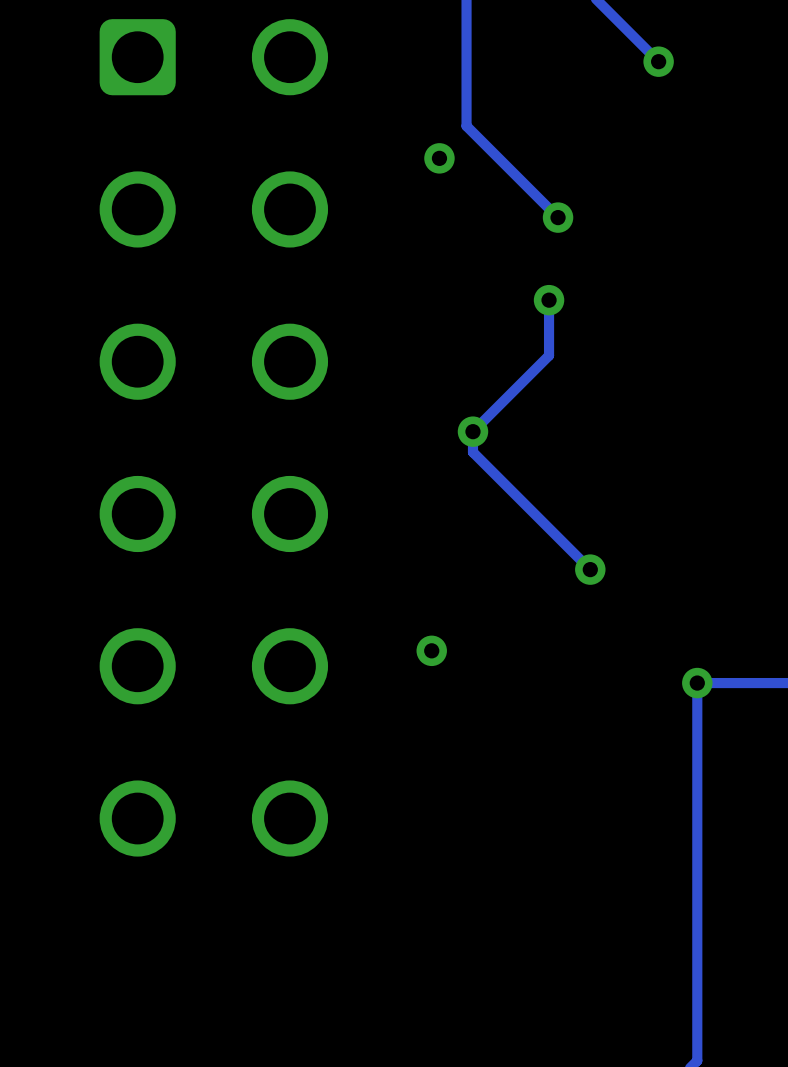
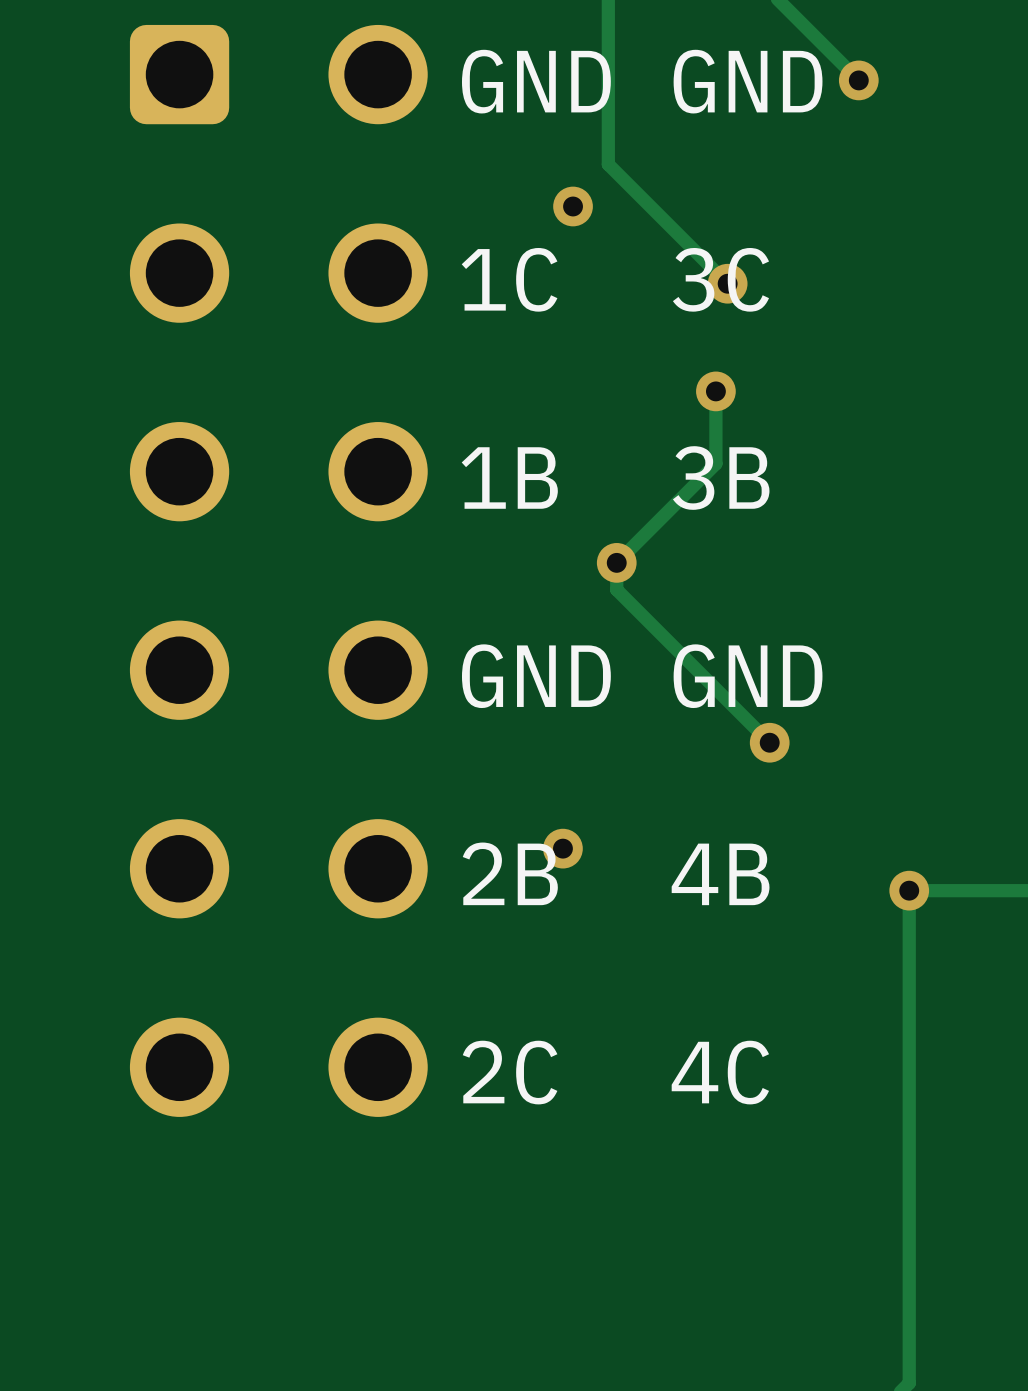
text: none -> GND GND (642, 81)
text: none -> 1C 3C (615, 279)
text: none -> 1B 3B (615, 478)
text: none -> GND GND (642, 676)
text: none -> 2B 4B (616, 873)
text: none -> 2C 4C (615, 1072)

